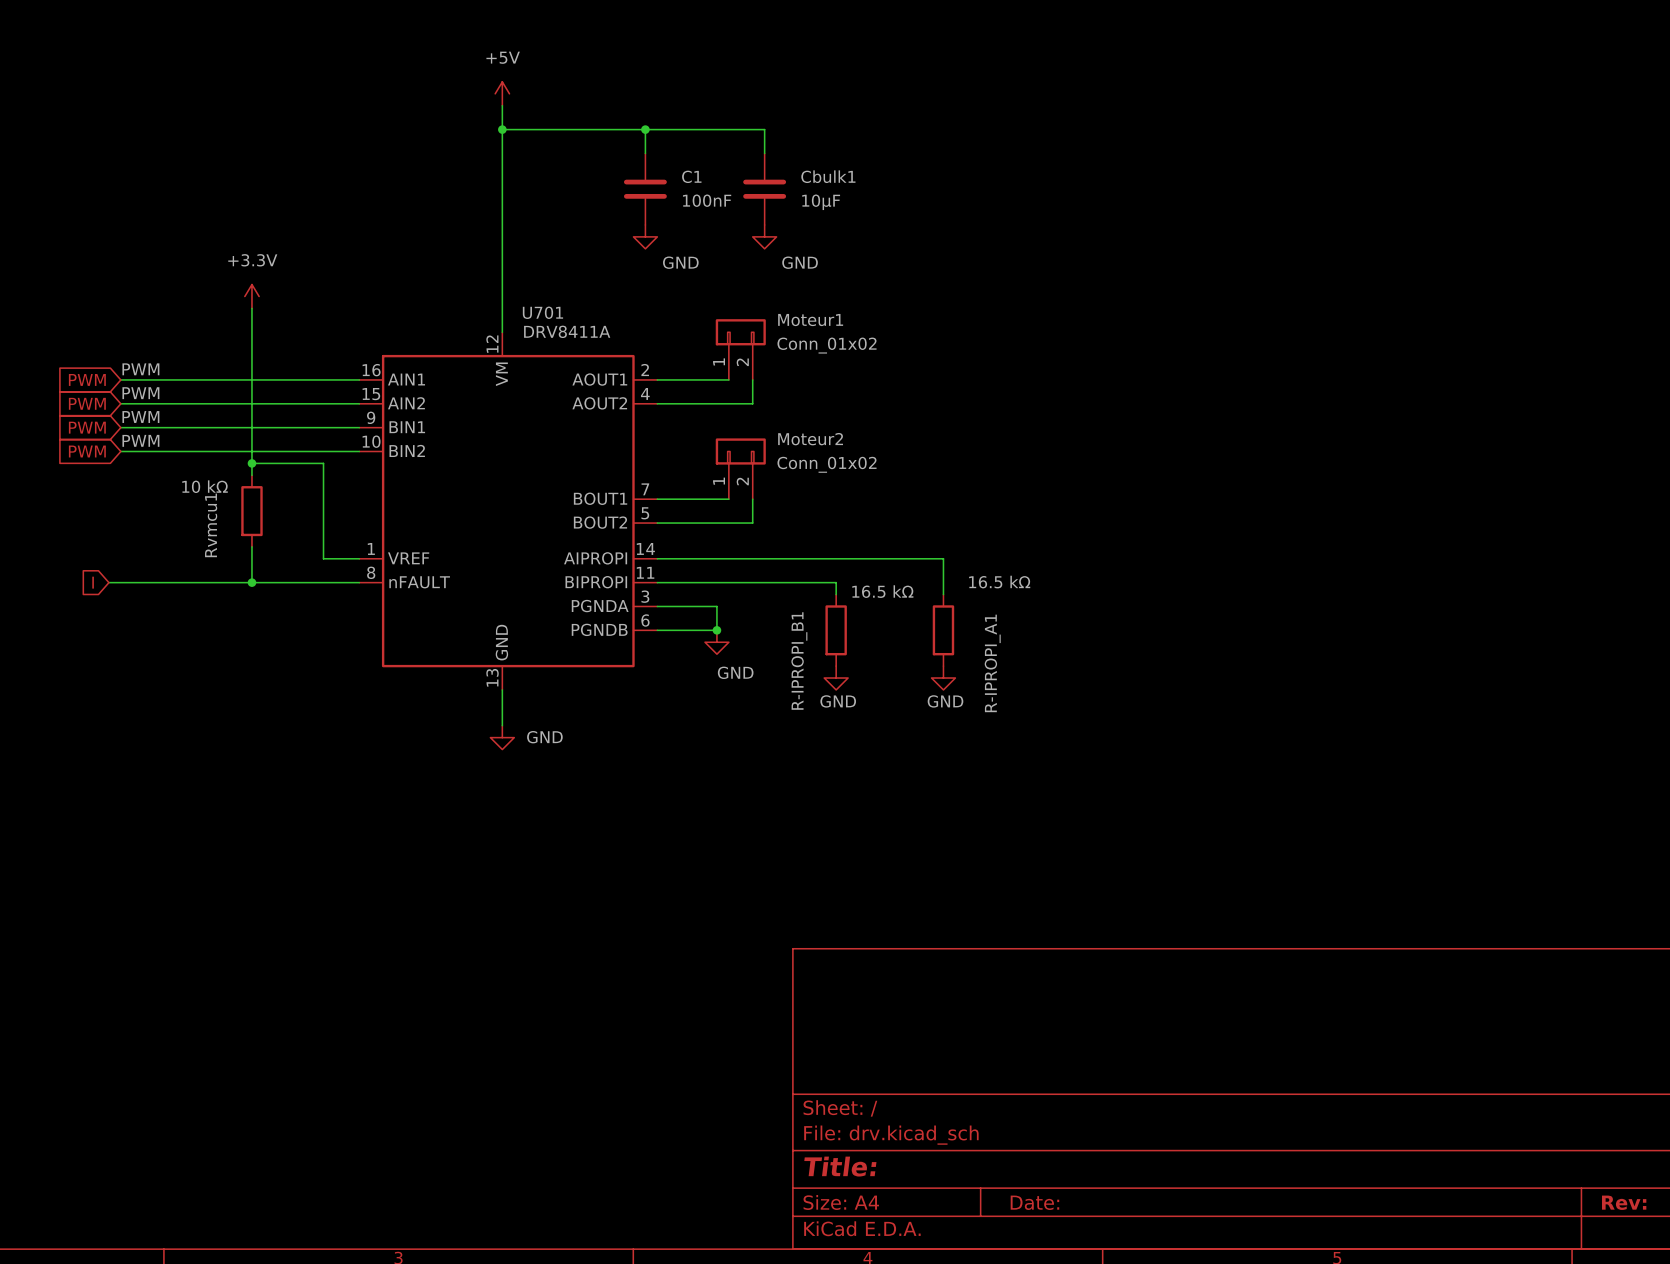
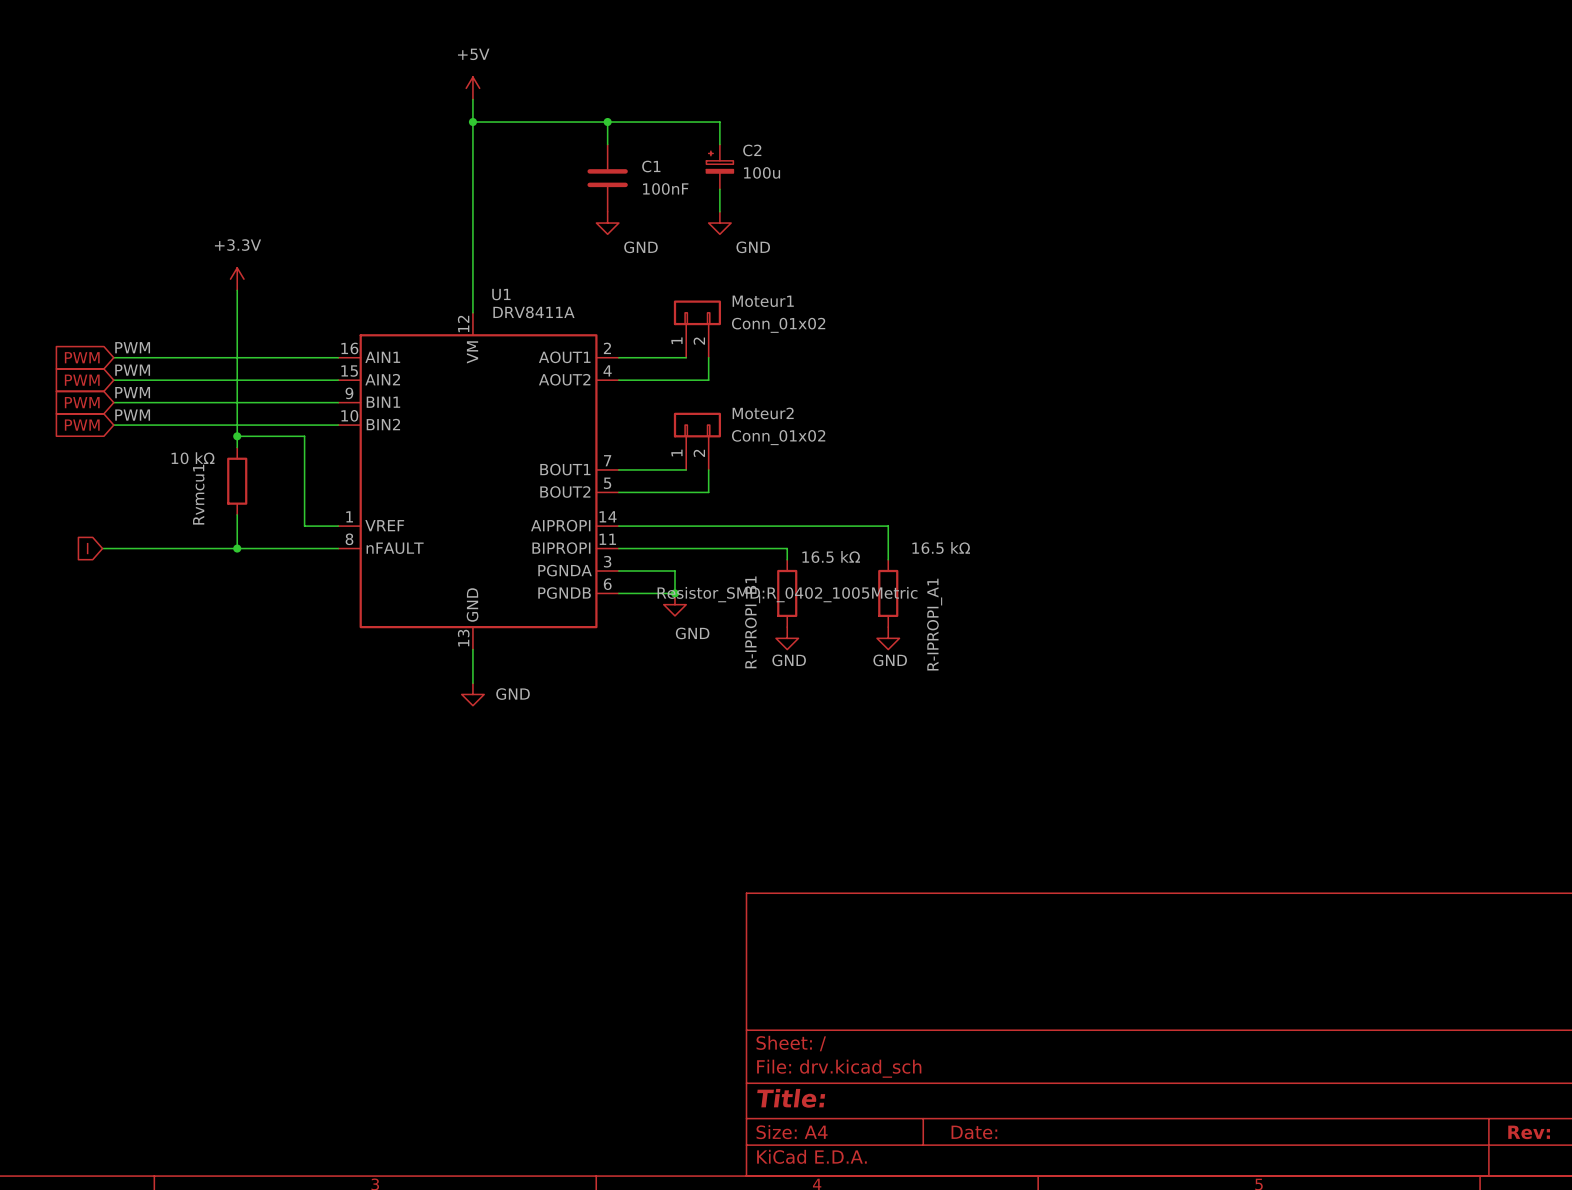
C2: none -> 100u (719, 166)
Cbulk1: 10µF (764, 189) -> none
U701 name: U701 (542, 312) -> U1 (501, 294)
R-IPROPI_B1 text: none -> Resistor_SMD:R_0402_1005Metric (787, 594)

